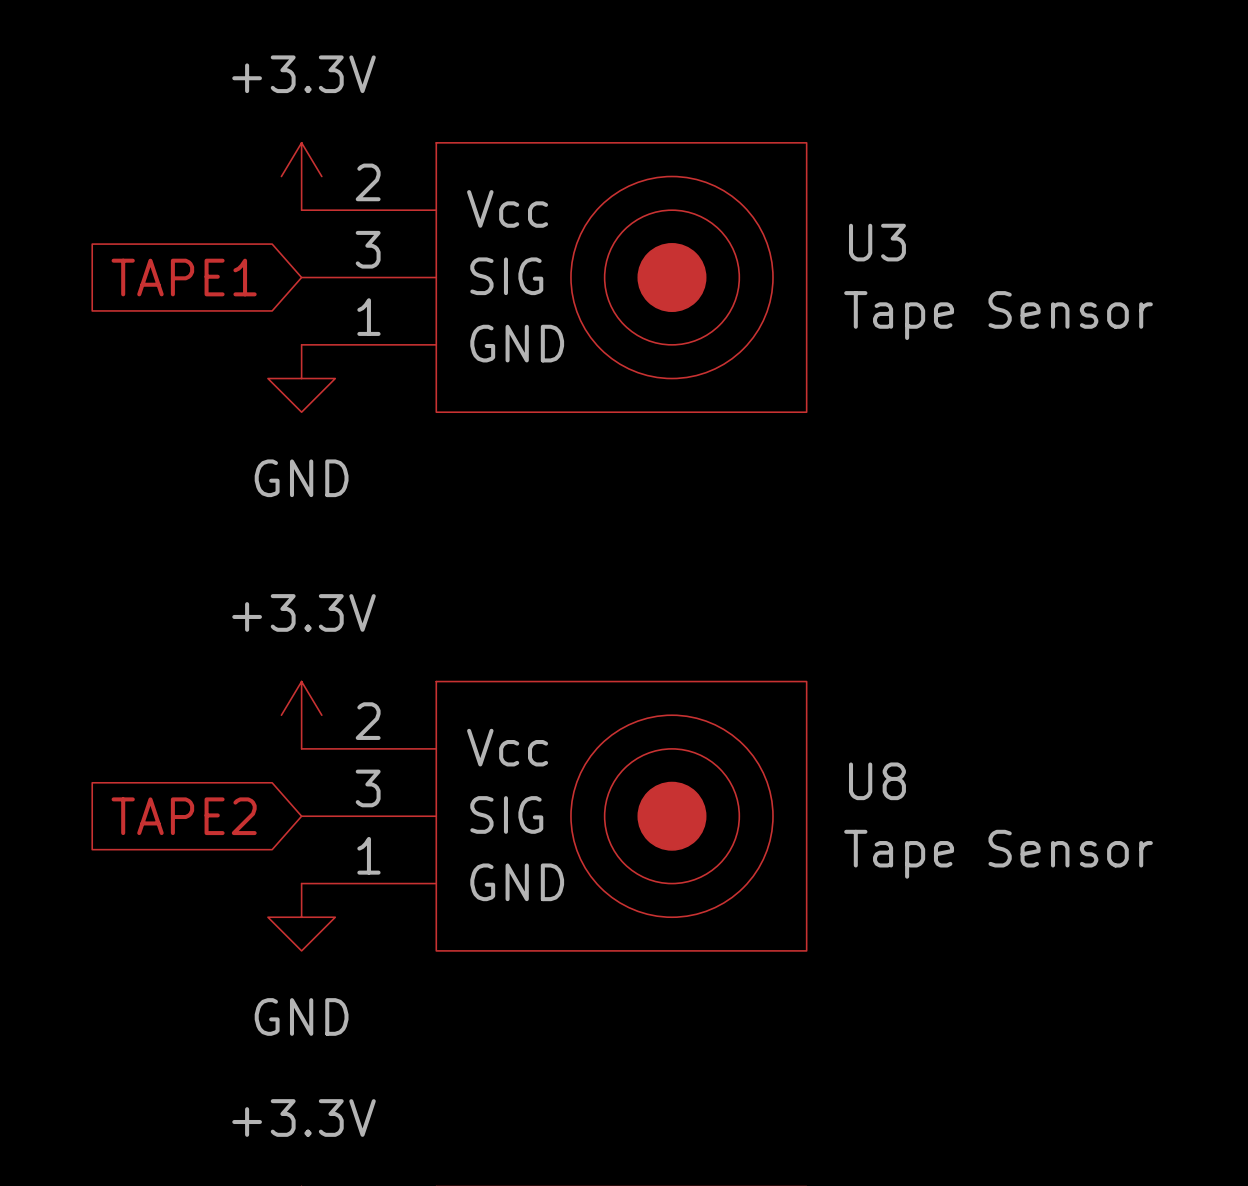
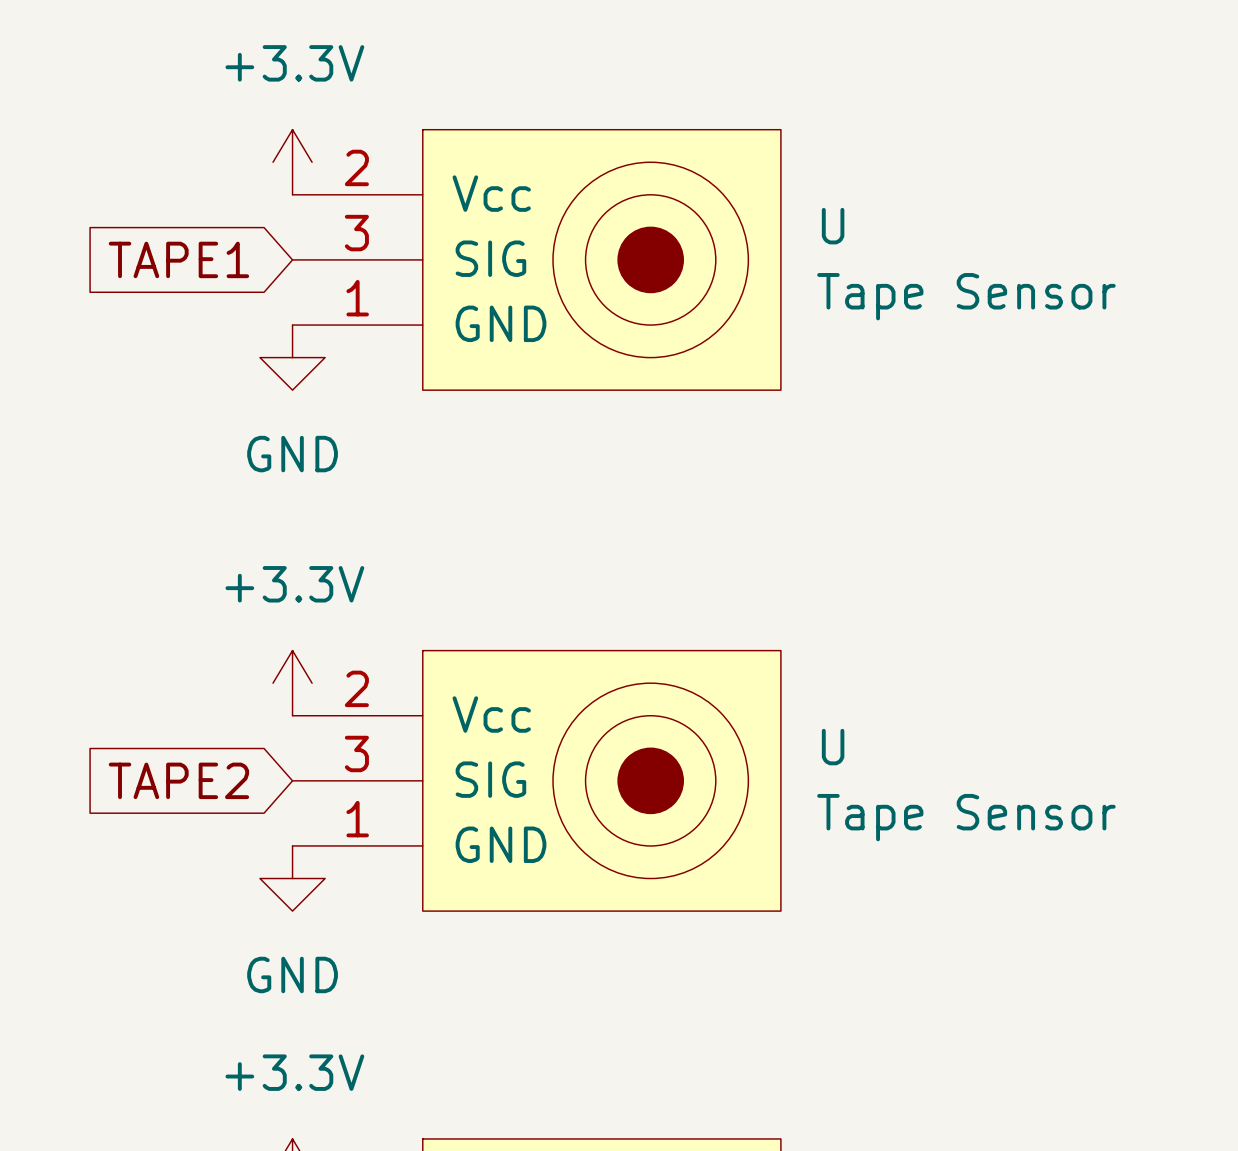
U3 name: U3 (877, 242) -> U (833, 226)
U8 name: U8 (877, 781) -> U (833, 747)

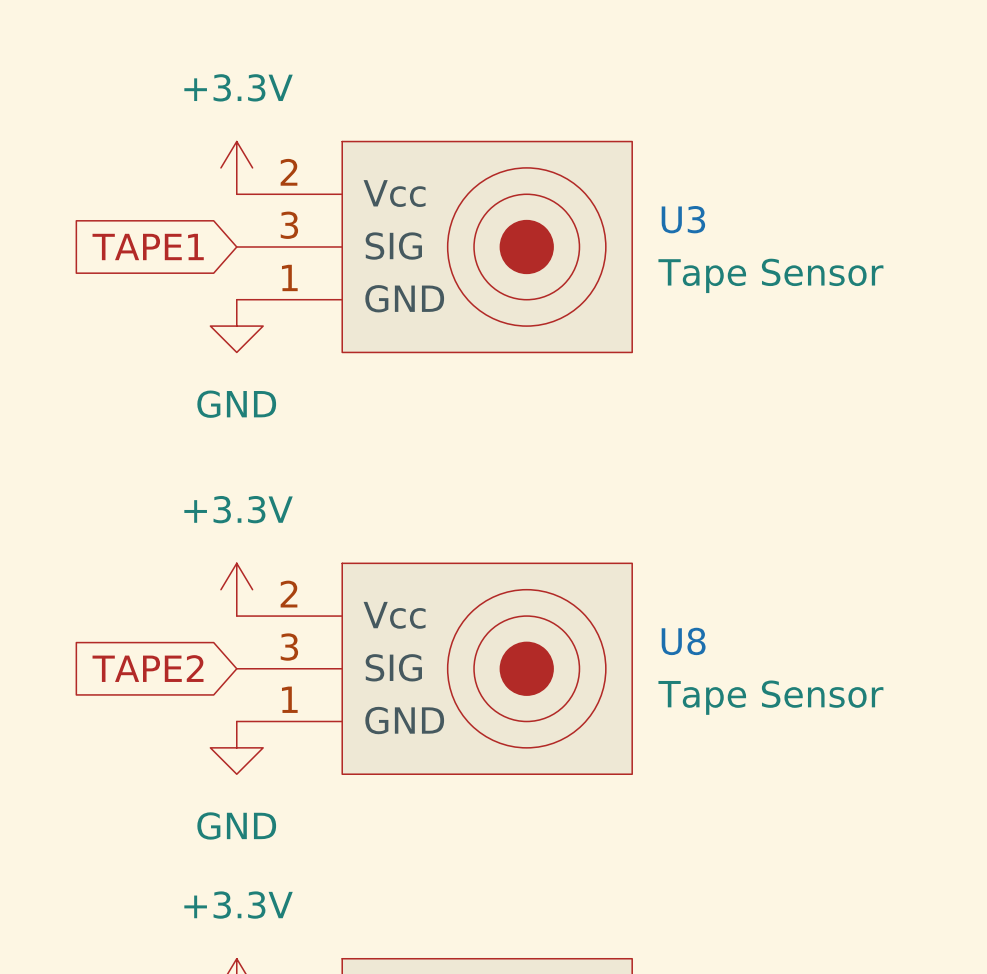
U name: U (833, 226) -> U3 (683, 219)
U name: U (833, 747) -> U8 (683, 641)

